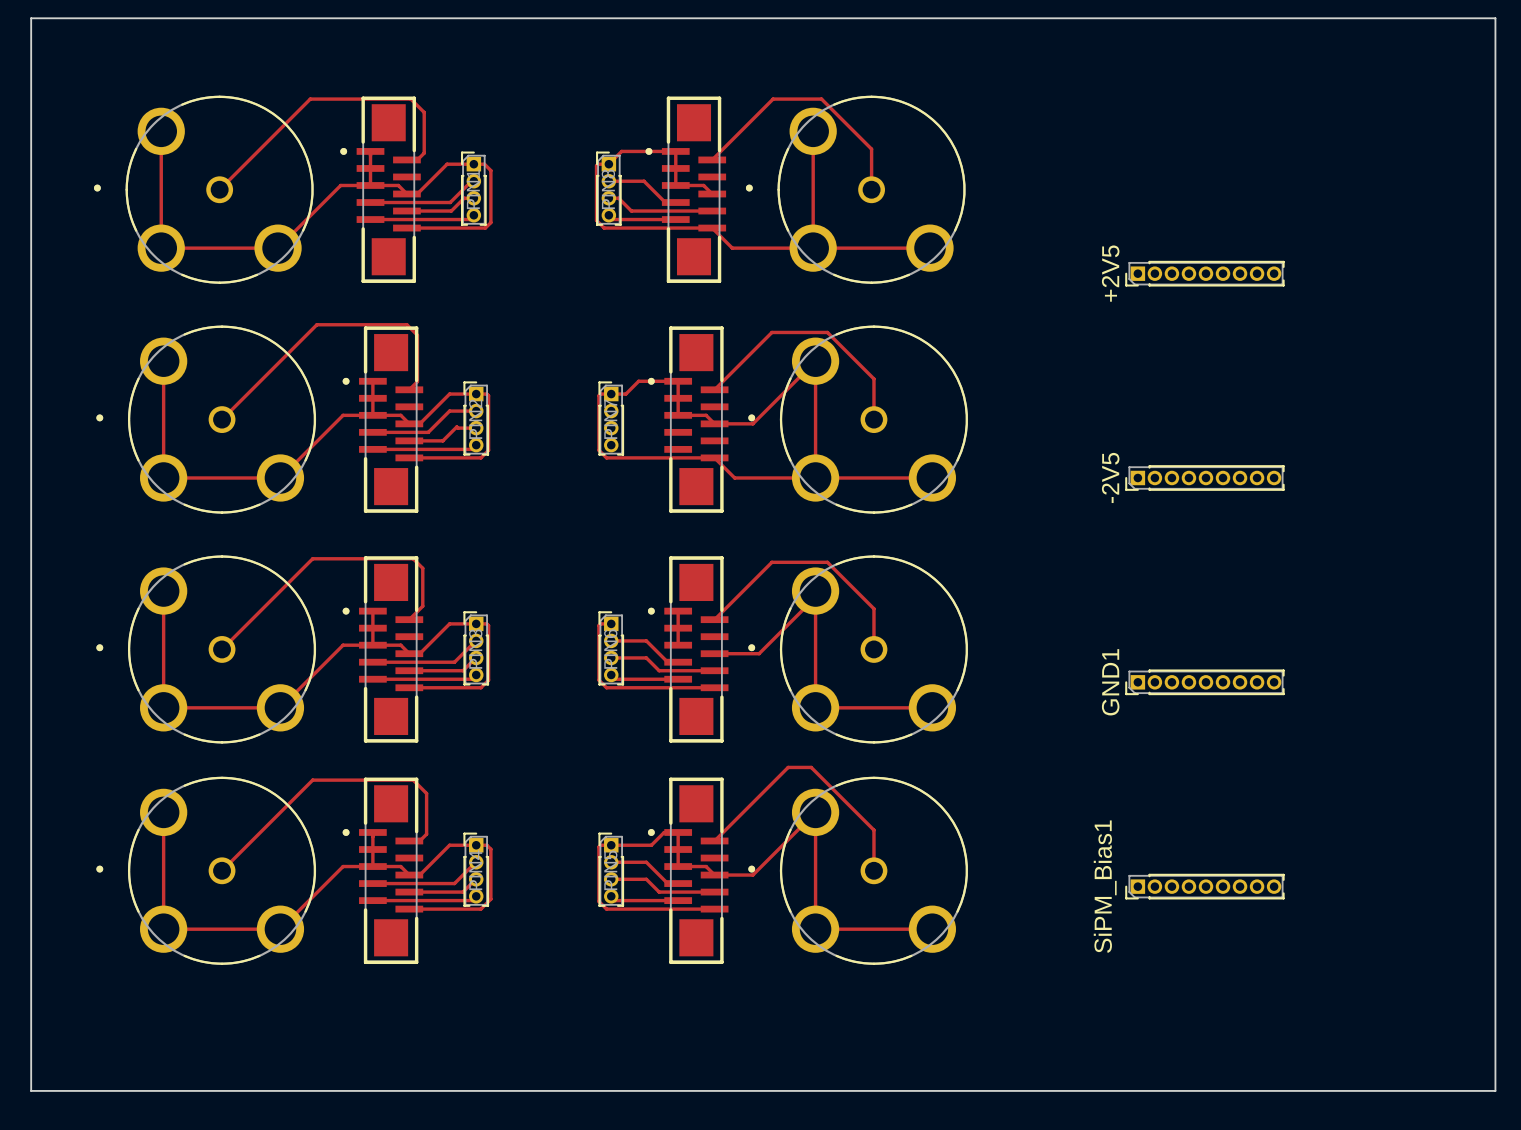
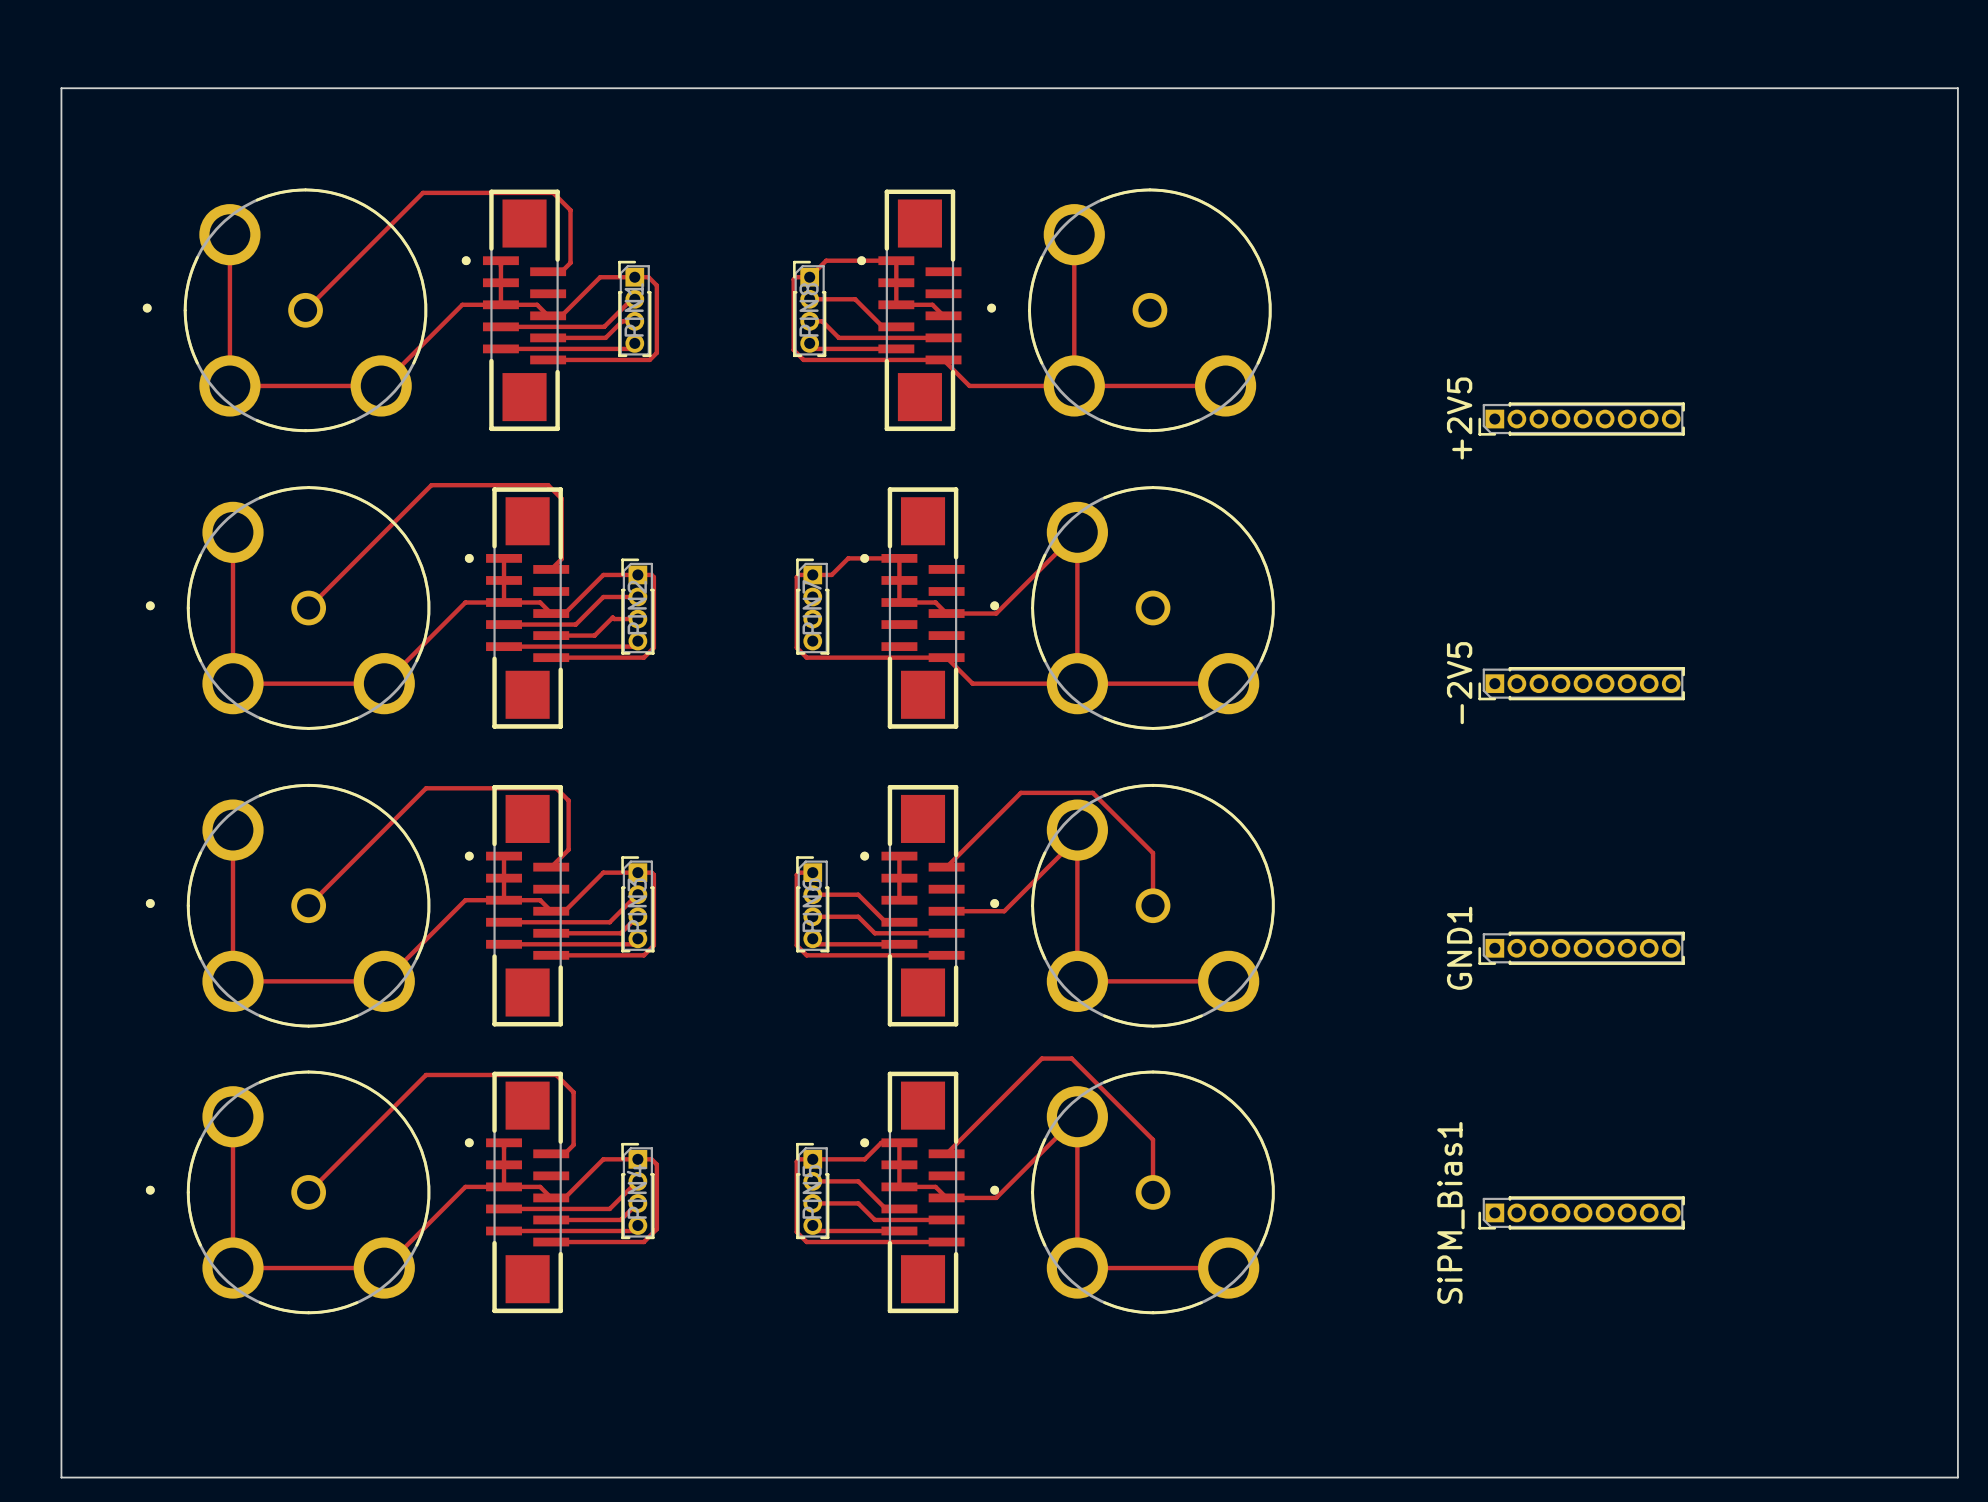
top track: (712, 159) (773, 99) (821, 99) (871, 149) (871, 189) -> none
top track: (714, 389) (771, 332) (827, 332) (873, 378) (873, 419) -> none

